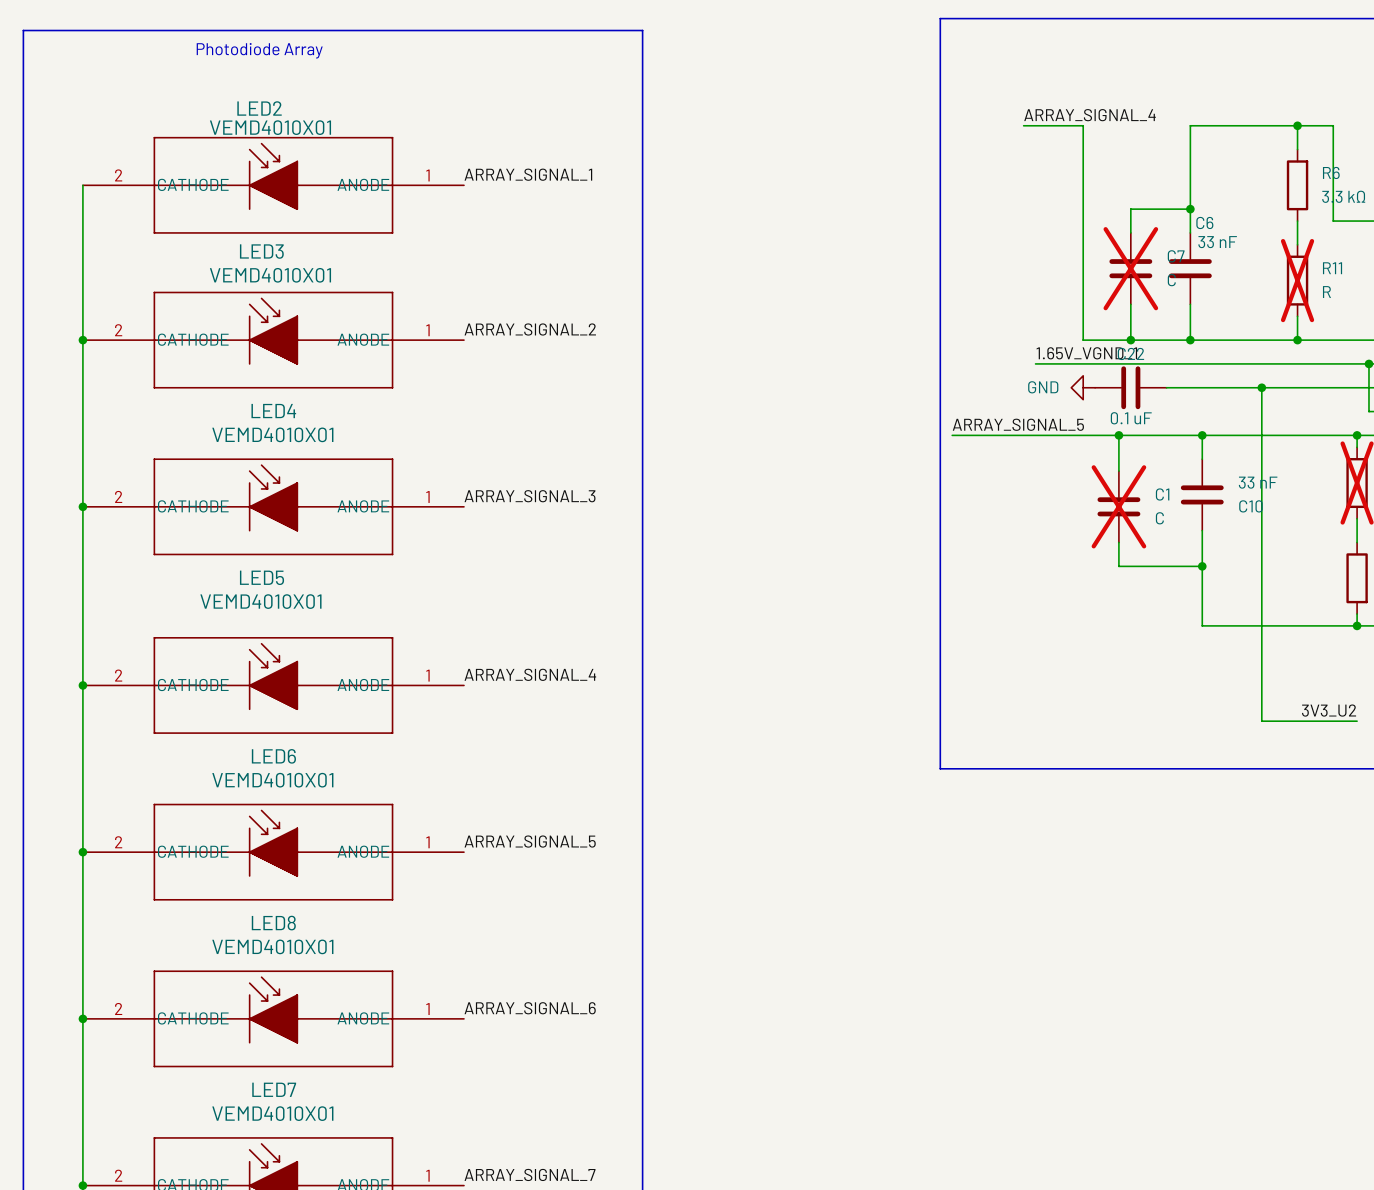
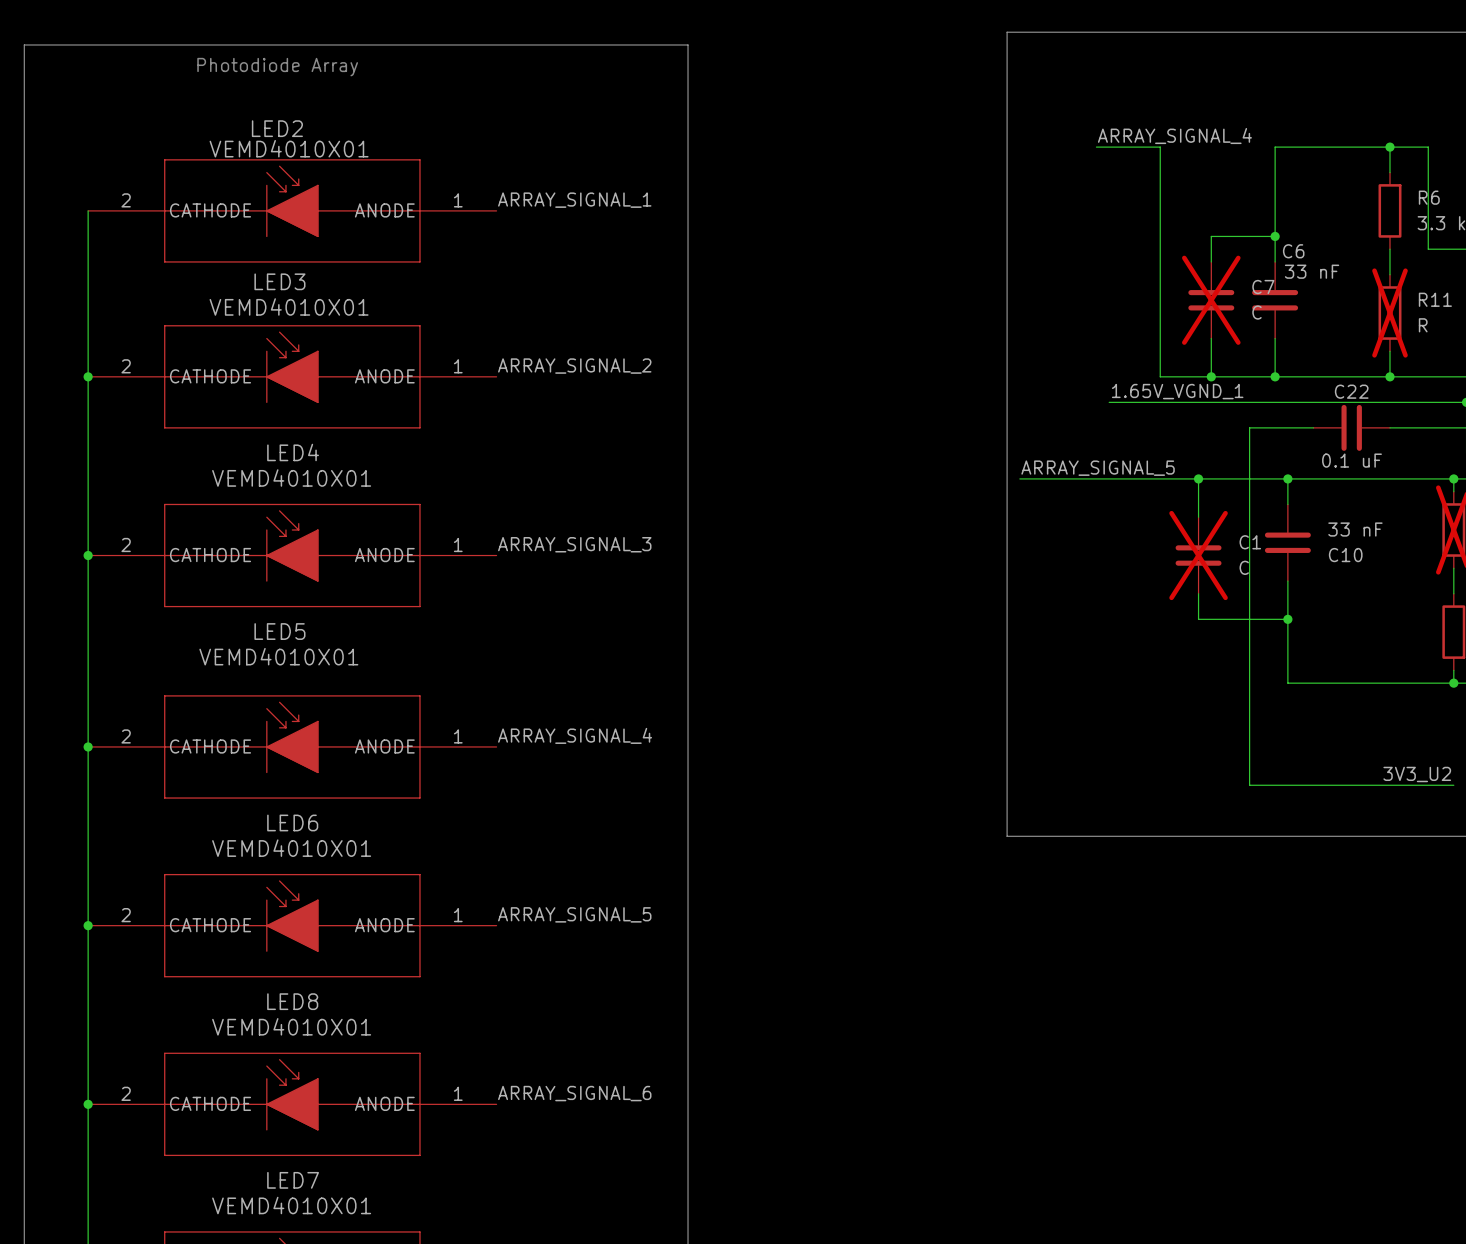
power symbol: GND (1083, 387) -> none
C22 position: (1130, 387) -> (1351, 427)
wire: (1261, 387) (1261, 721) -> (1249, 427) (1249, 785) (1351, 785)
junction: (1261, 387) -> none

